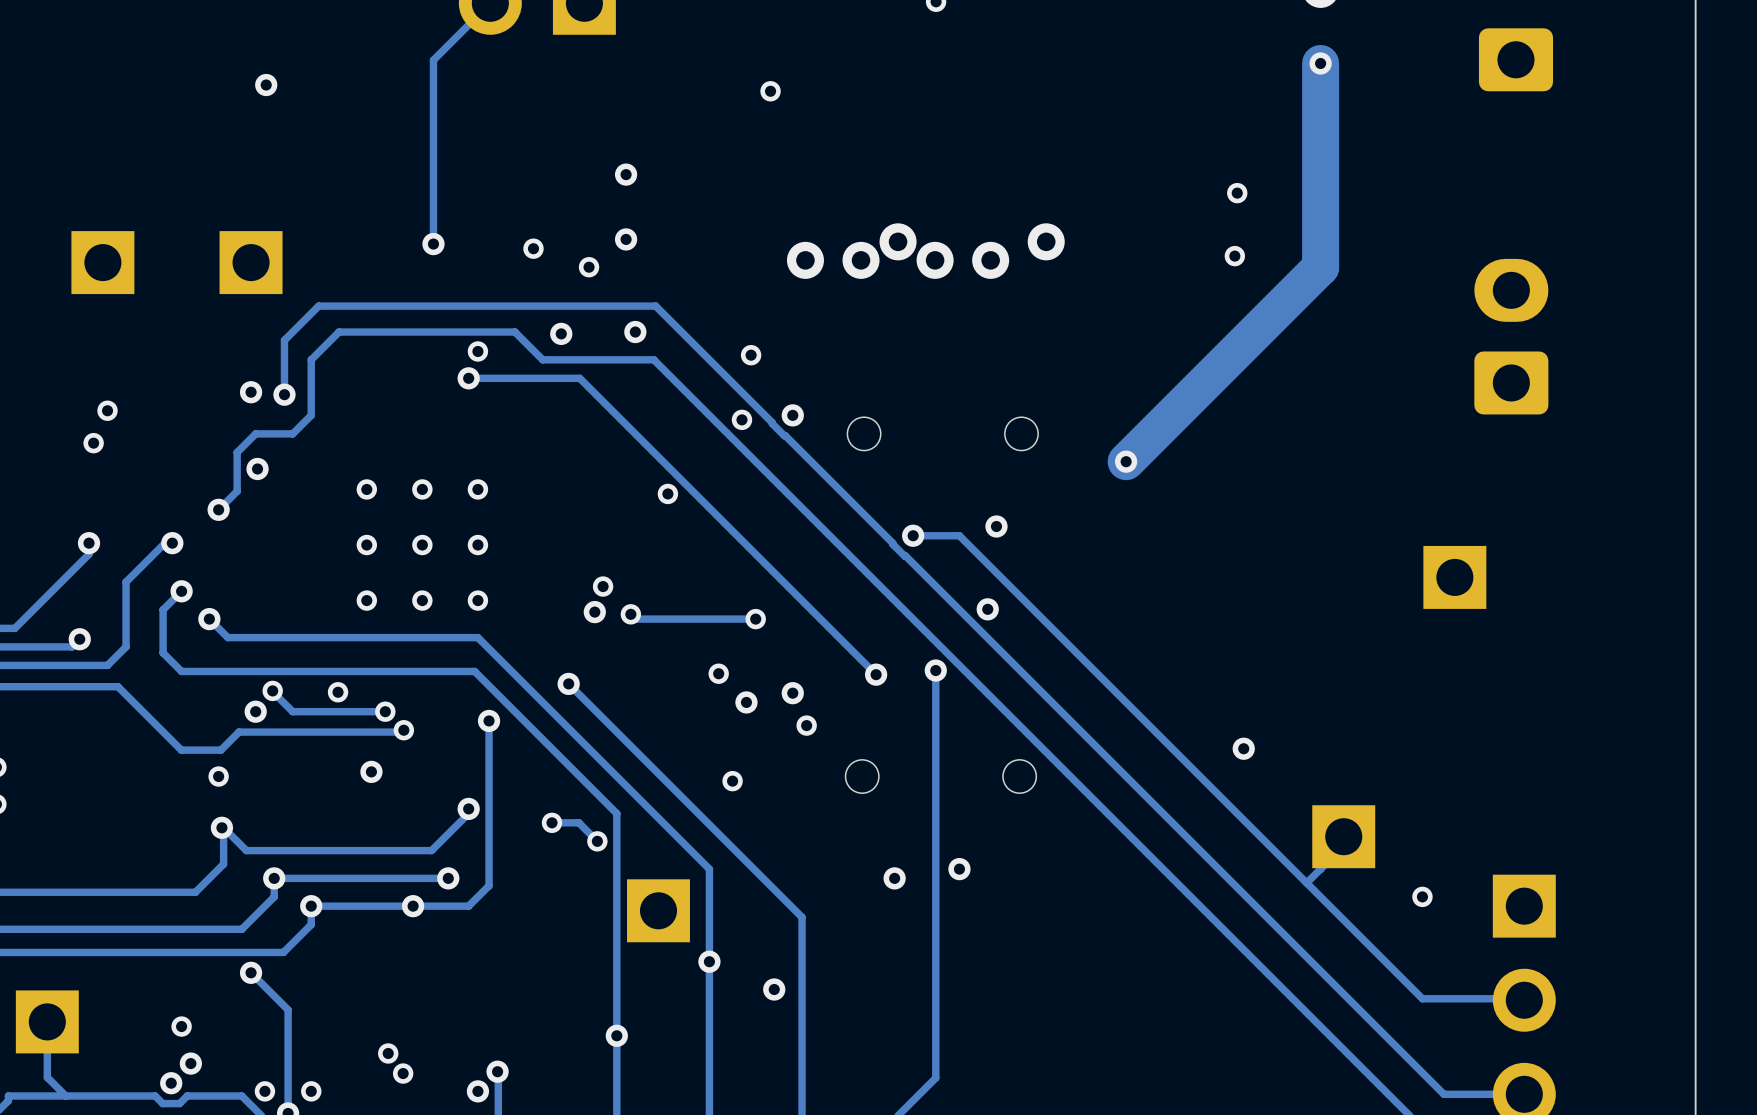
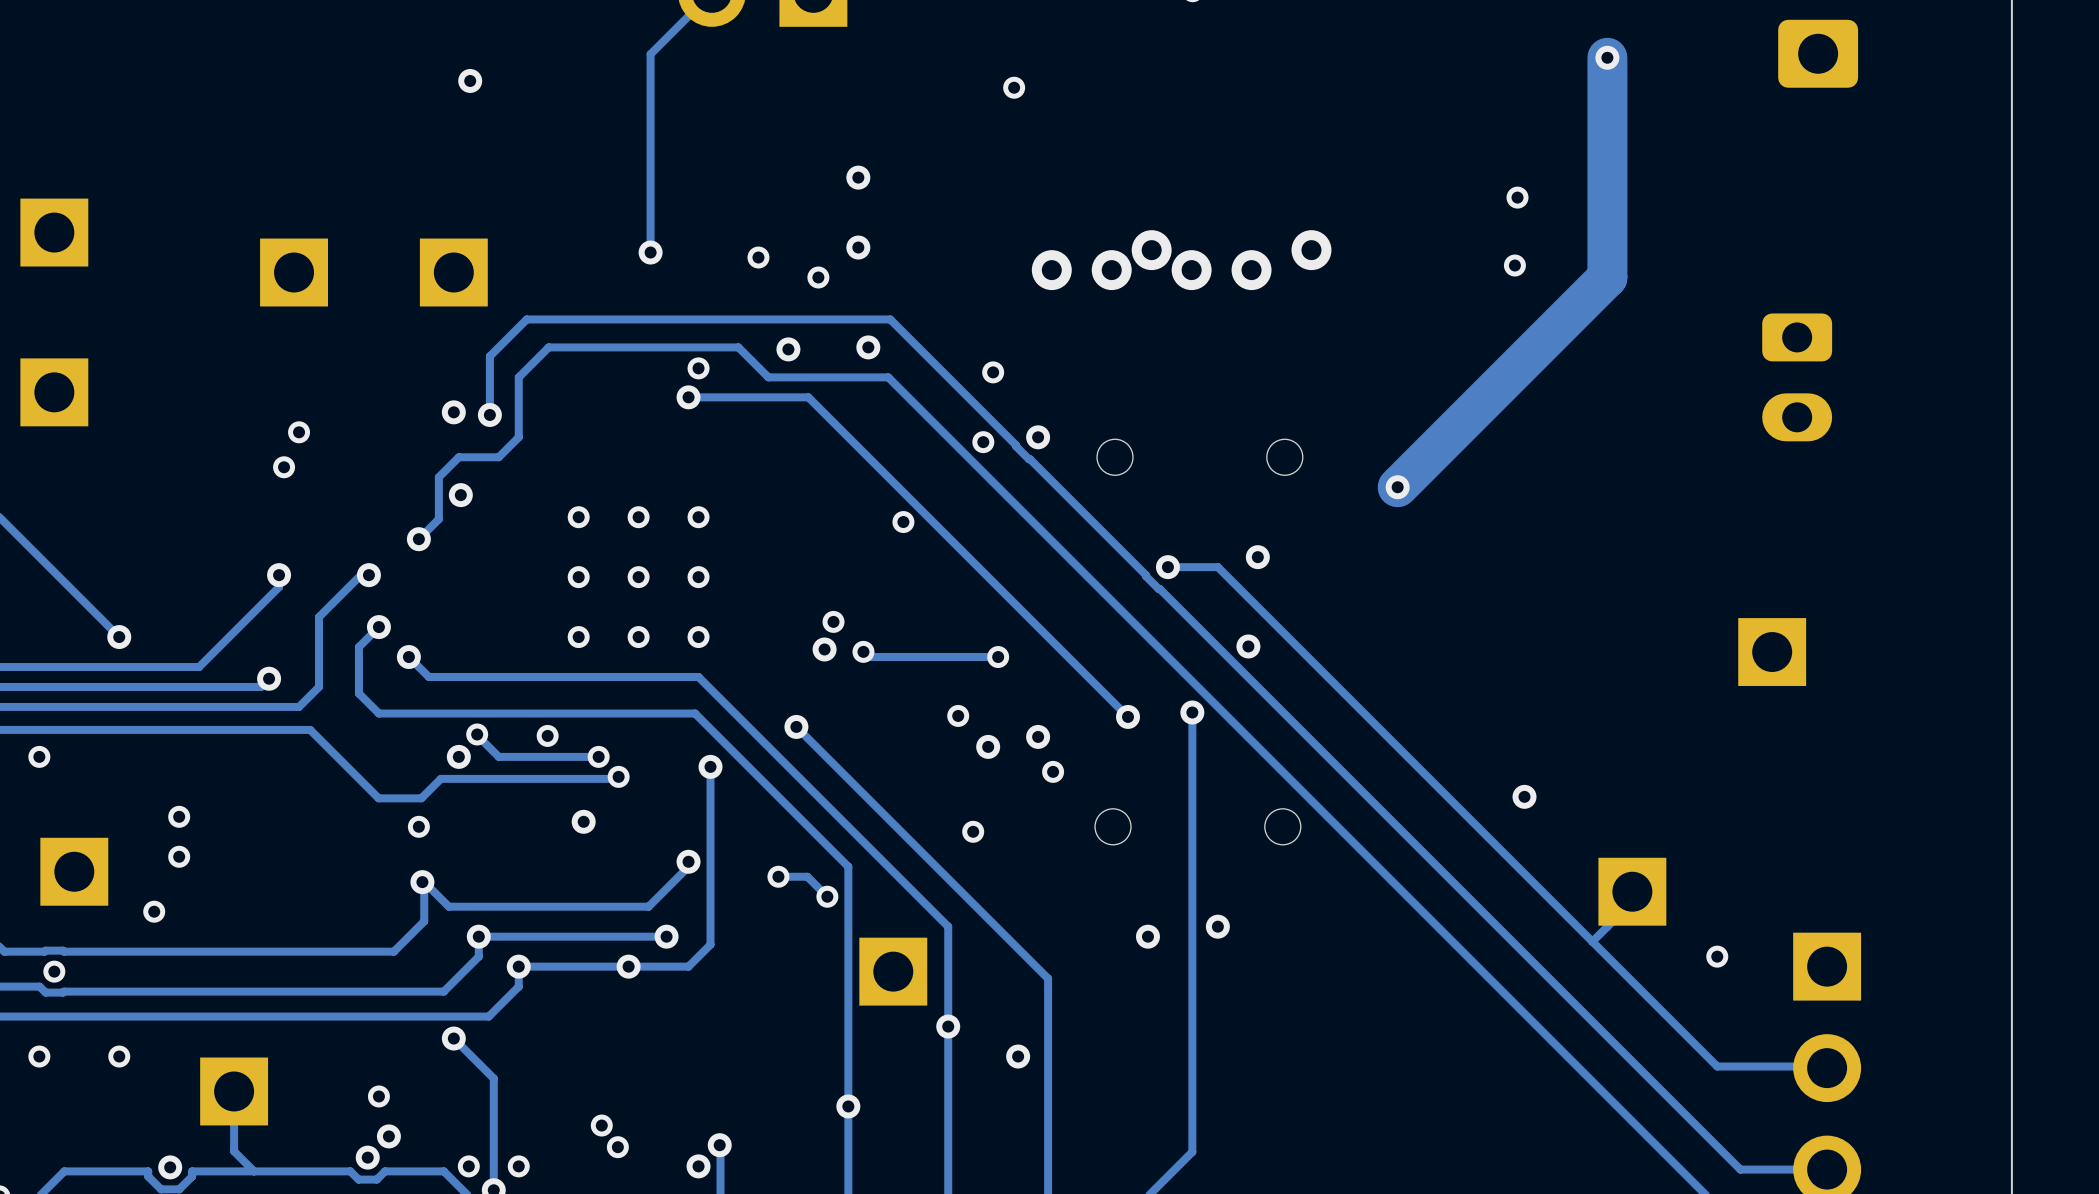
part footprint: [1474, 258, 1549, 415] -> [1762, 313, 1833, 442]
part position: (1454, 577) -> (1772, 652)

